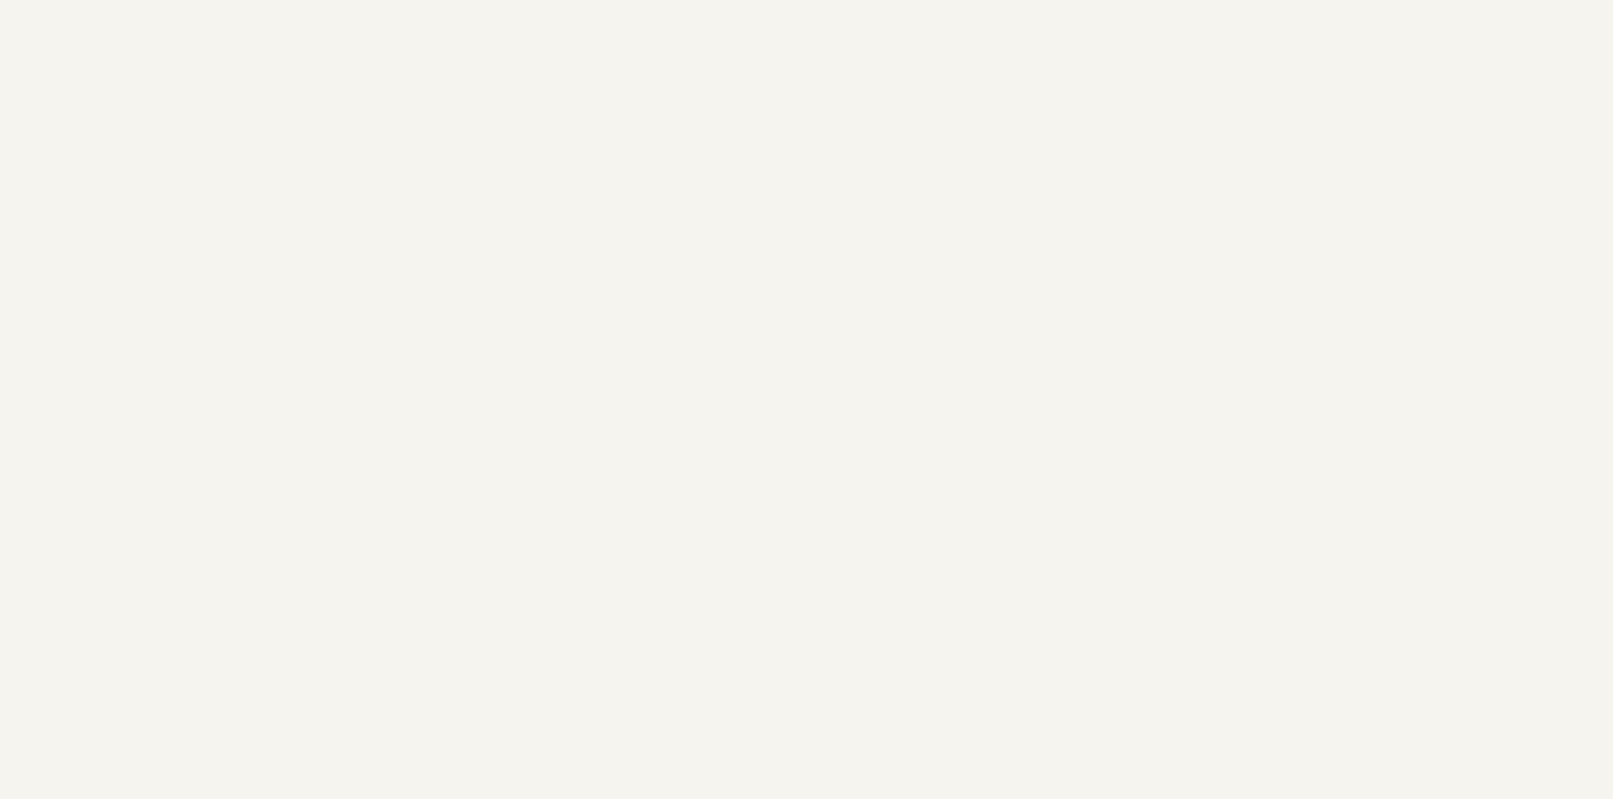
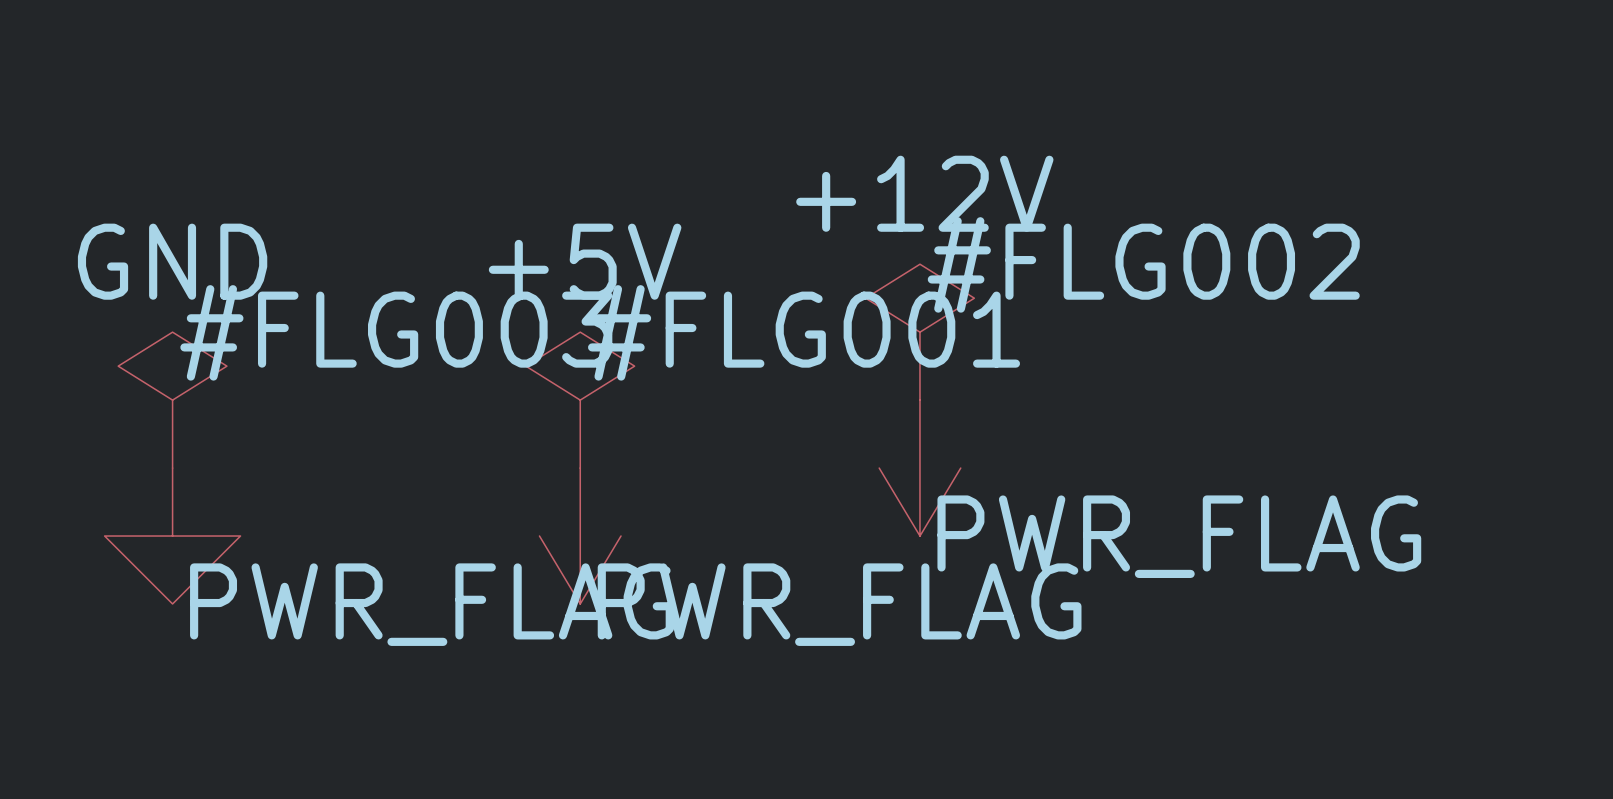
#FLG002: none -> PWR_FLAG (919, 332)
#FLG003: none -> PWR_FLAG (172, 400)
#FLG001: none -> PWR_FLAG (580, 400)
power symbol: none -> +12V (919, 468)
power symbol: none -> GND (172, 536)
power symbol: none -> +5V (580, 536)

